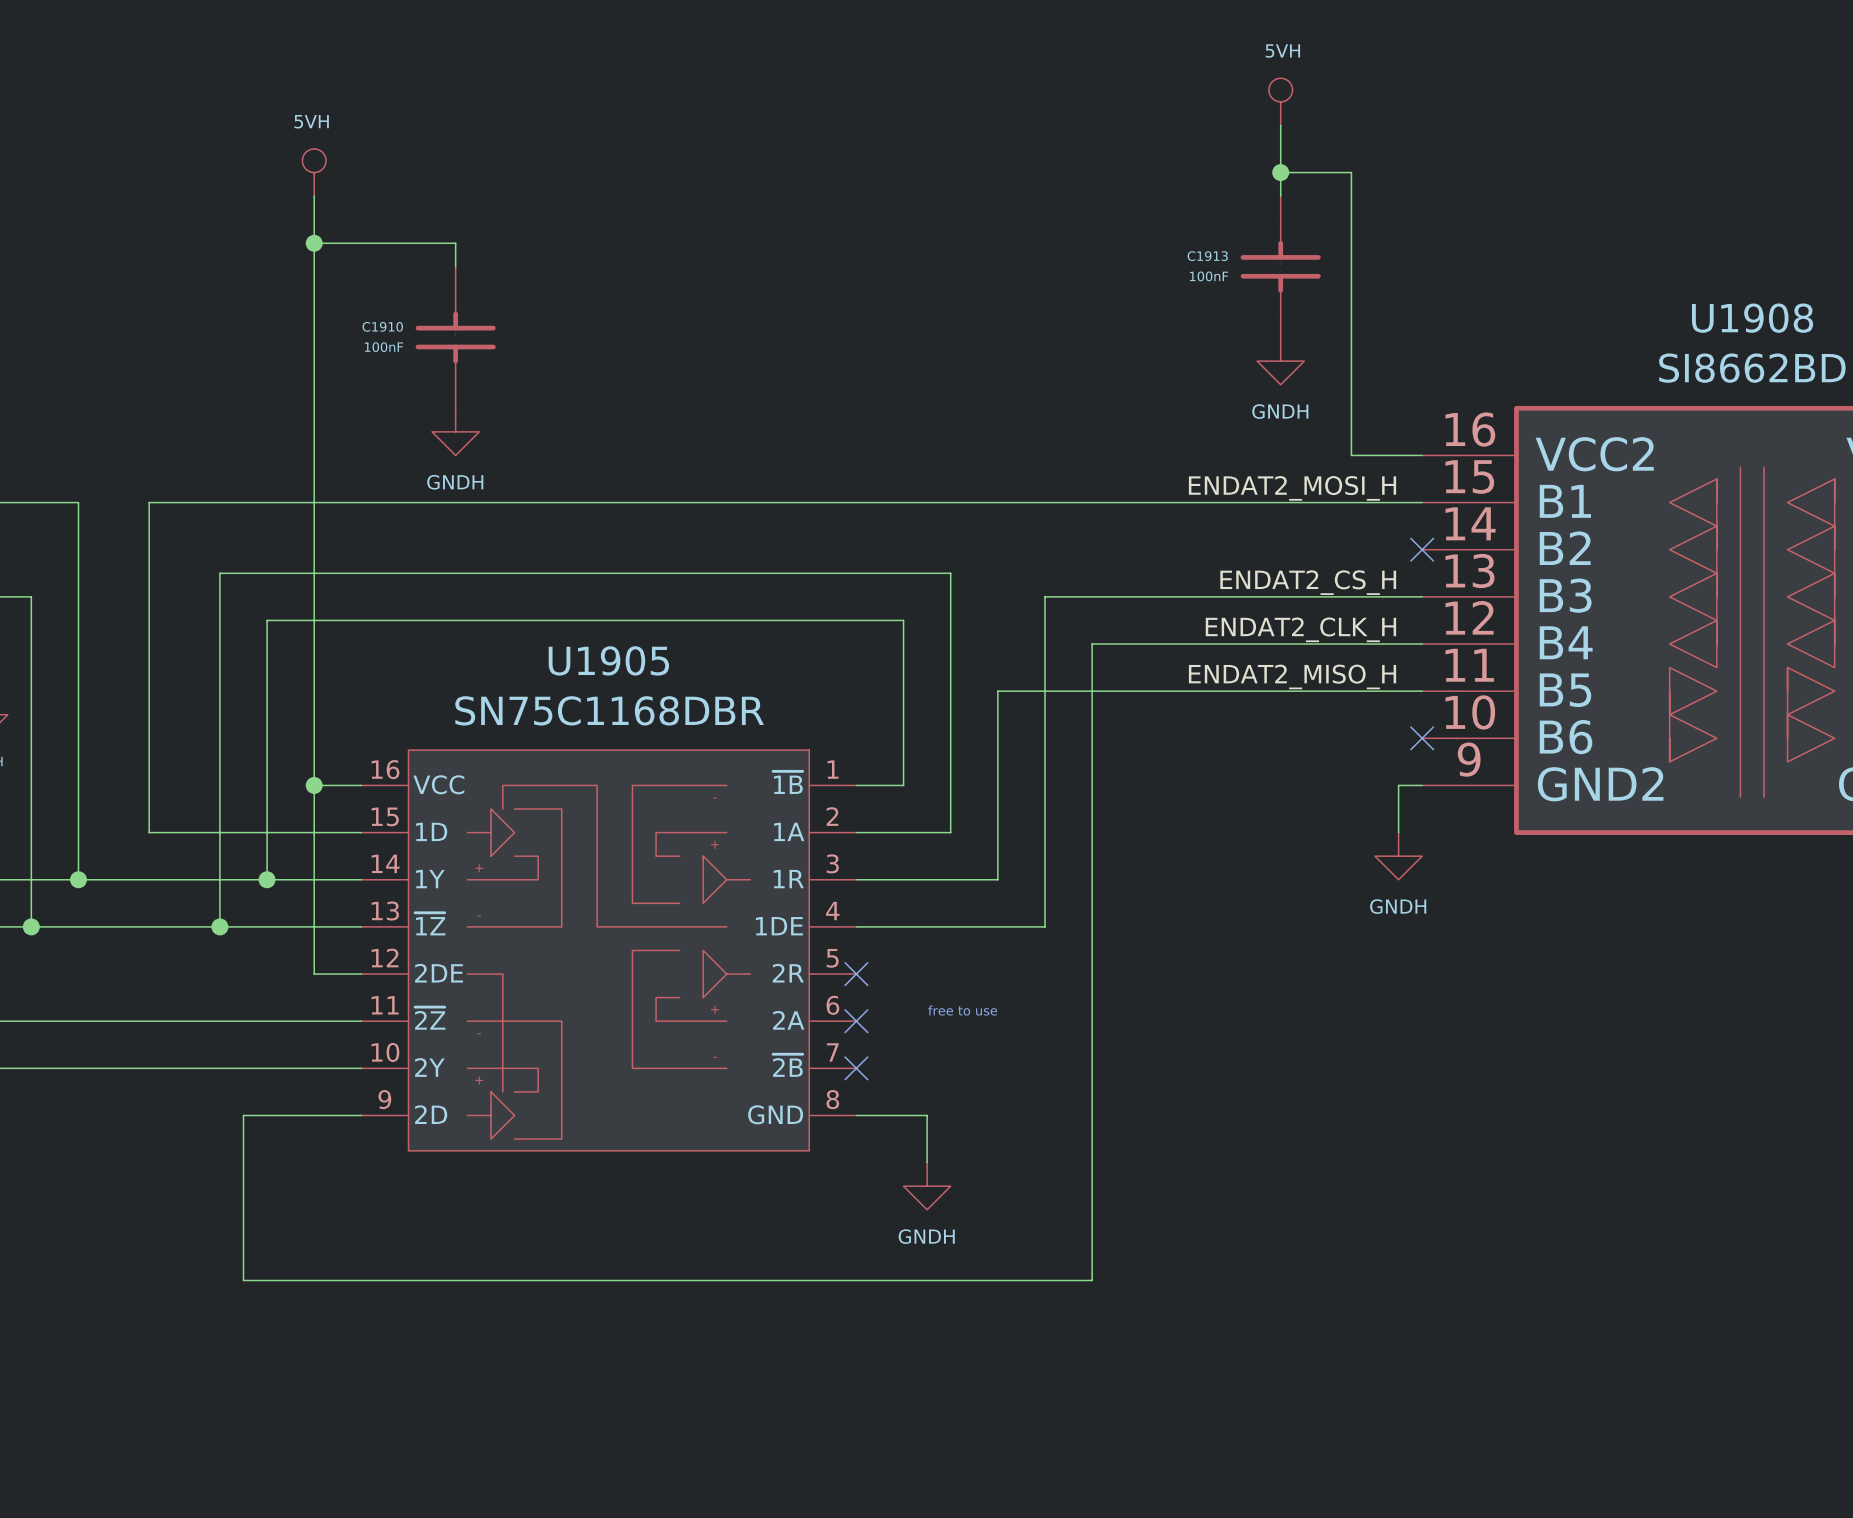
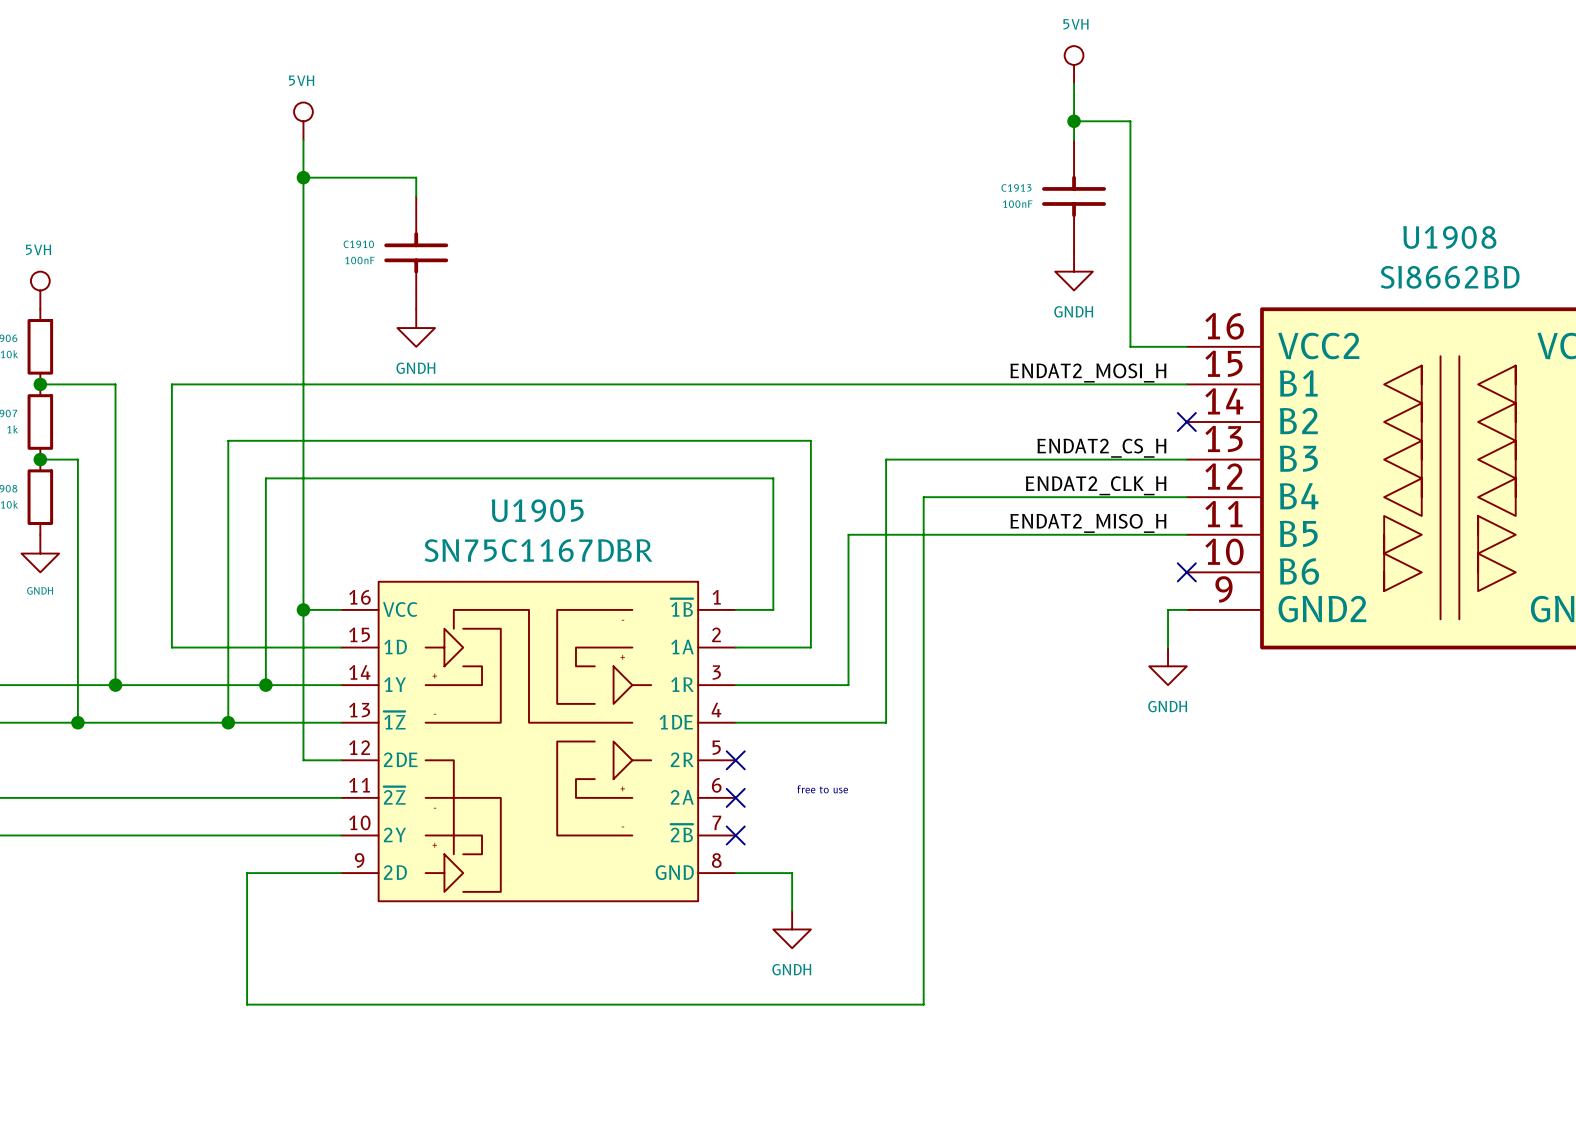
U1905 value: SN75C1168DBR (609, 710) -> SN75C1167DBR (538, 550)

